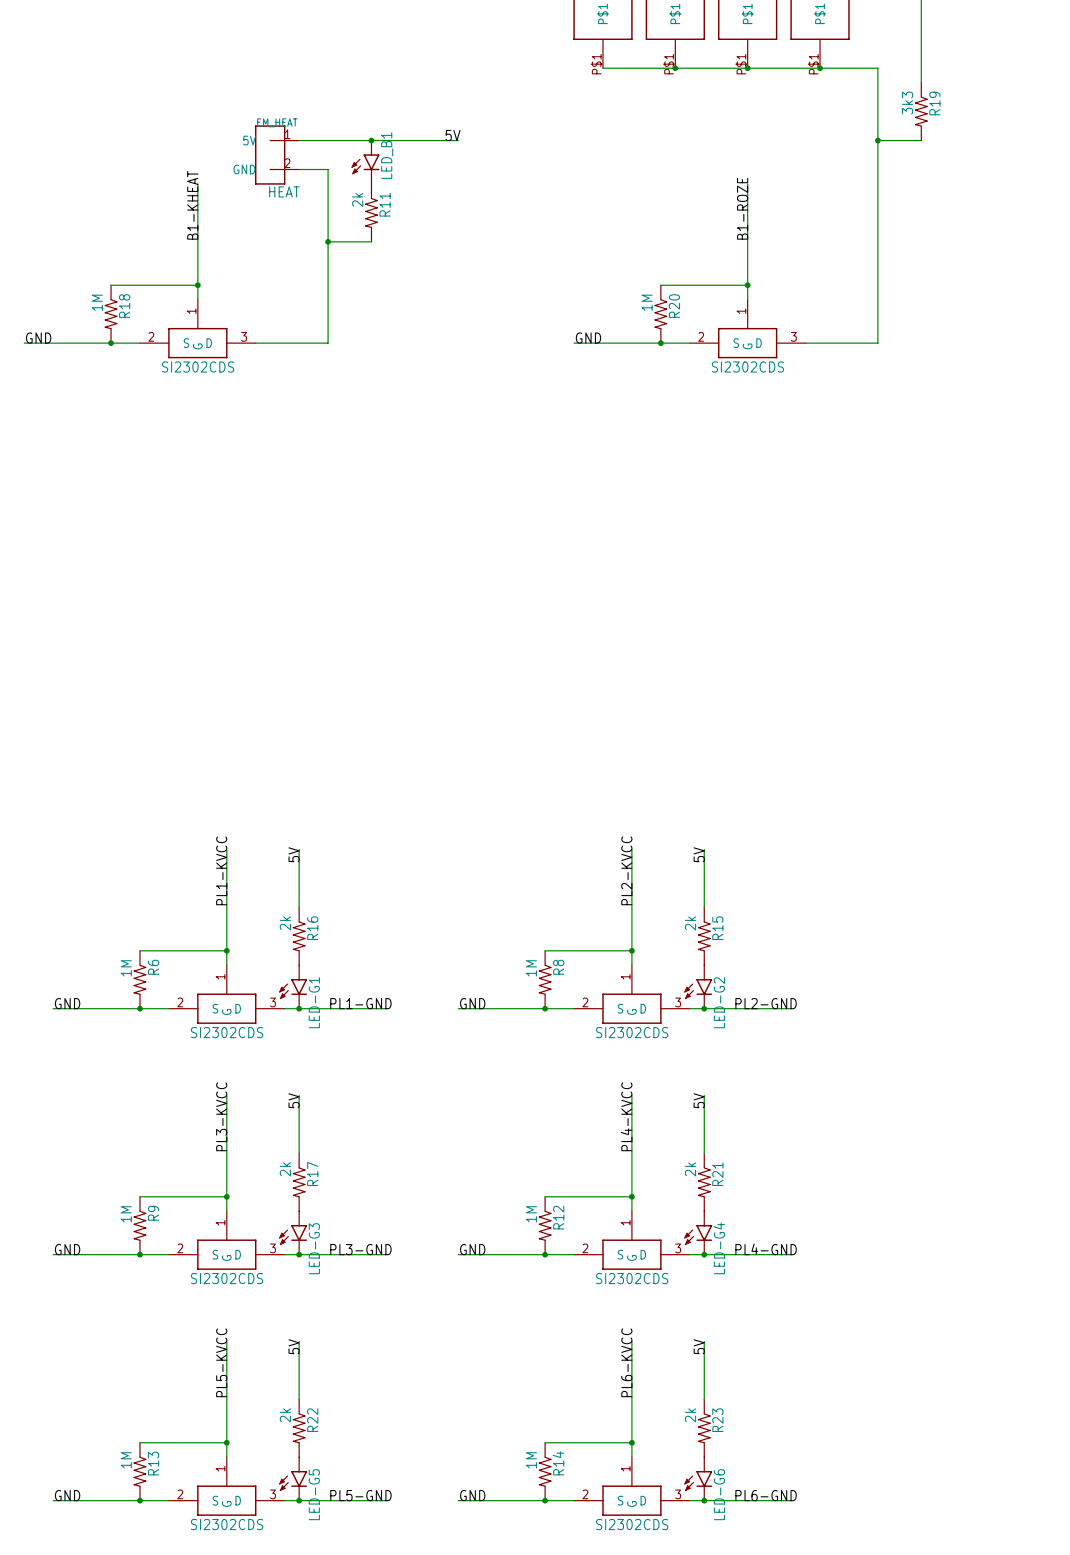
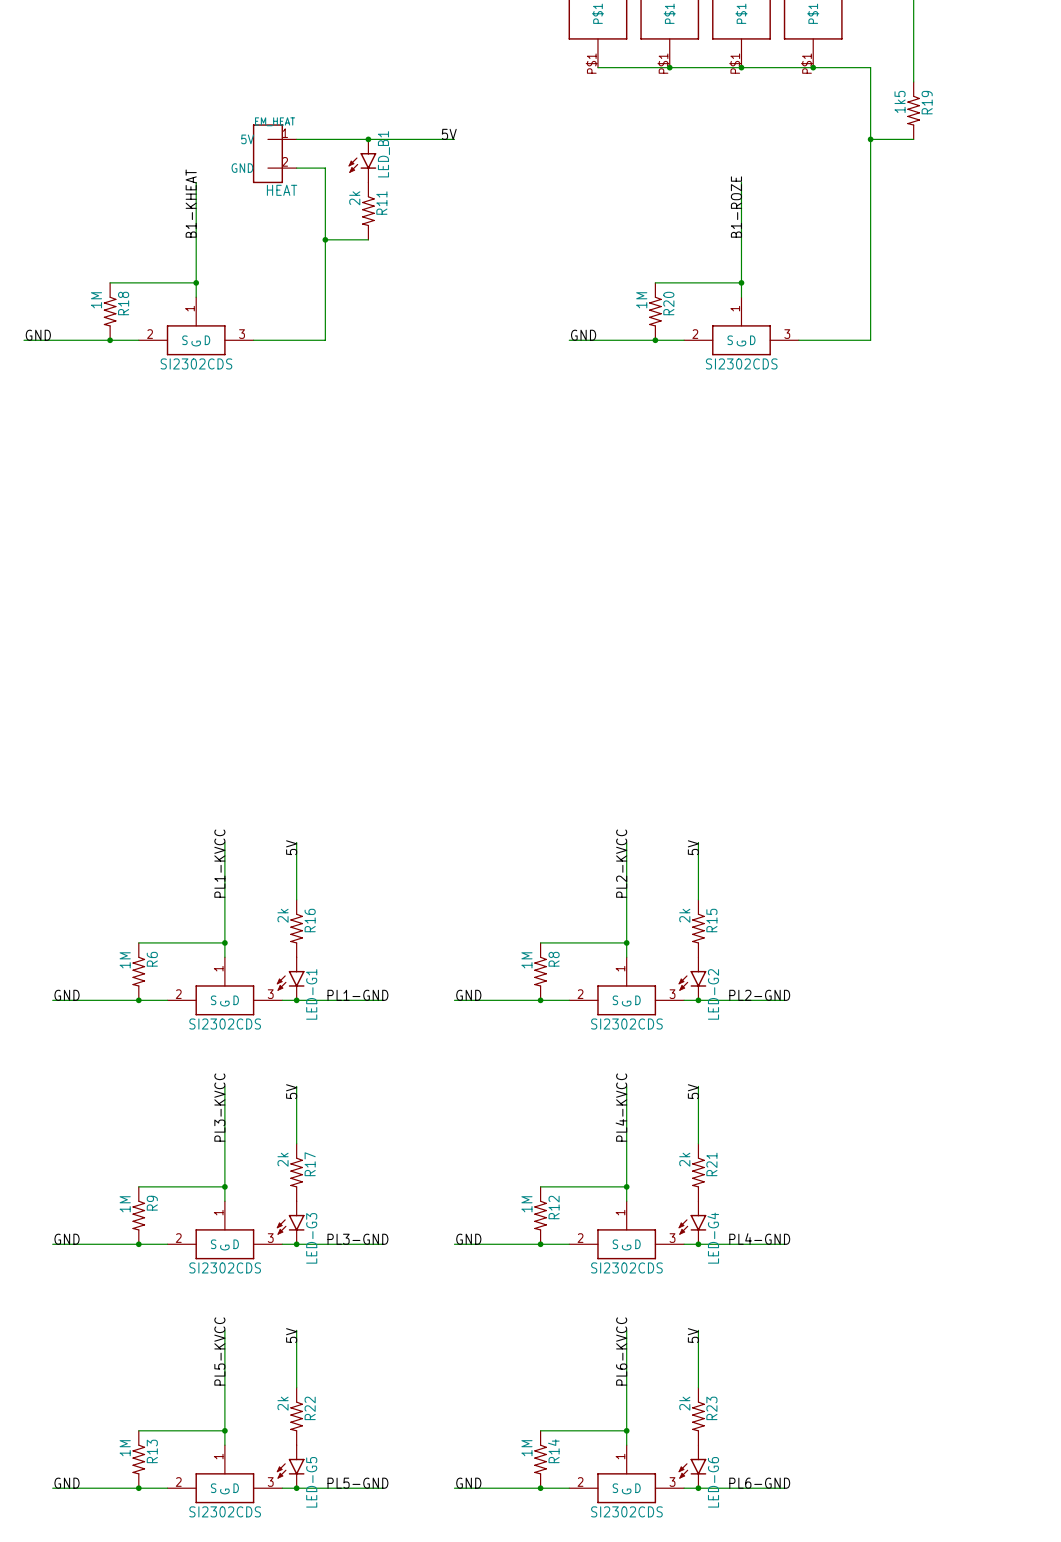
R19 value: 3k3 (907, 103) -> 1k5 (900, 101)

